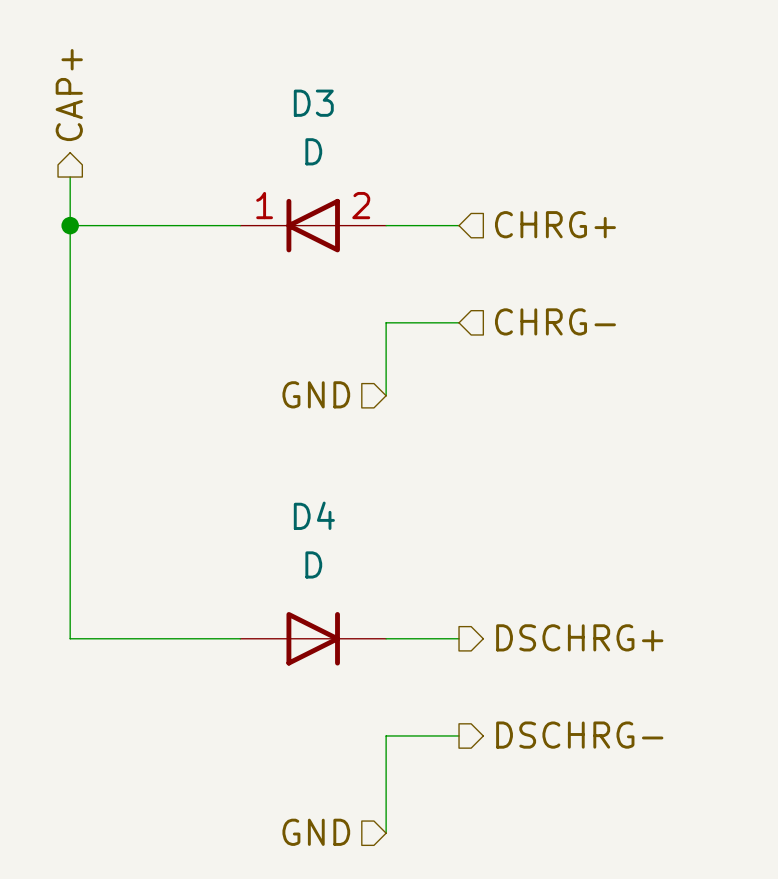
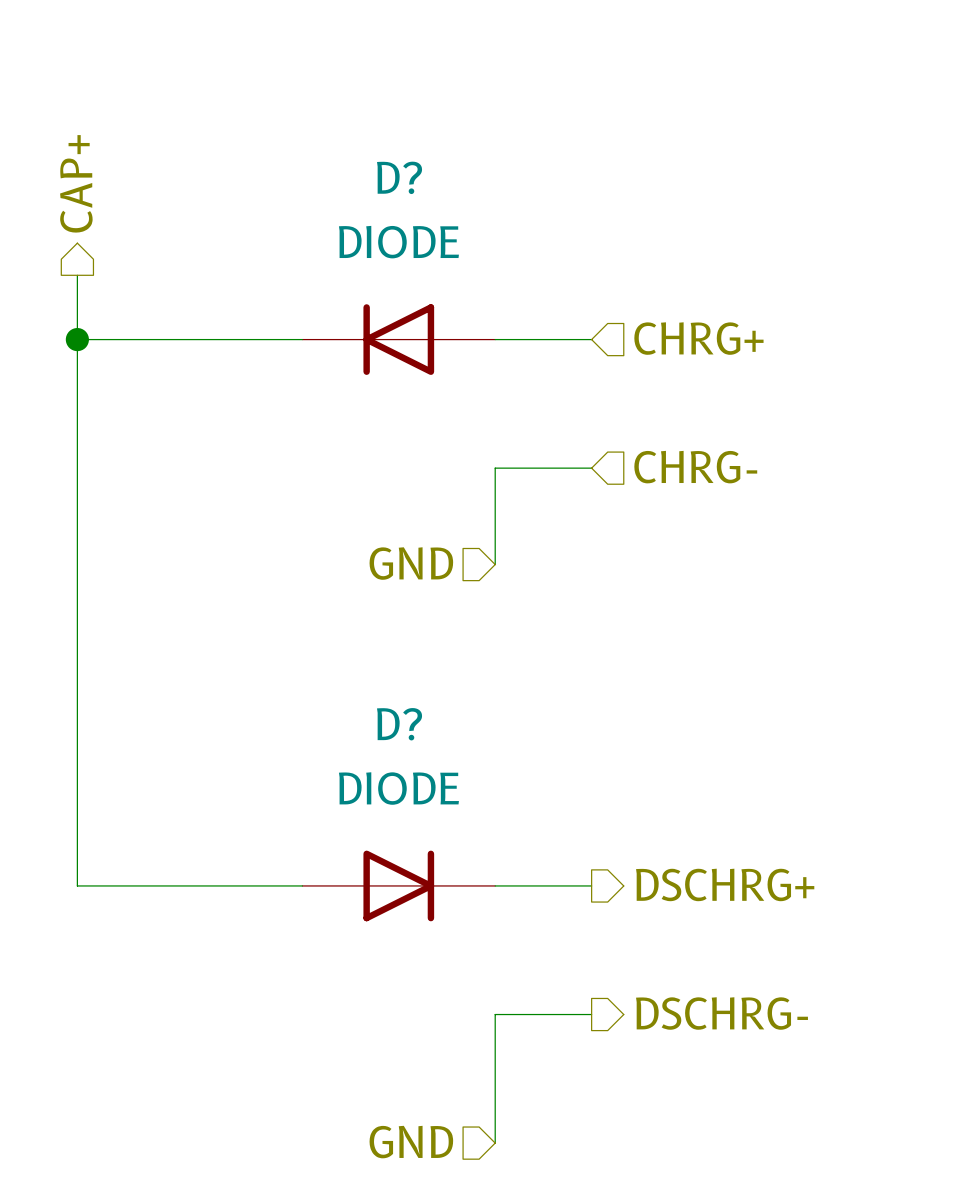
D3 name: D3 (313, 103) -> D? (399, 177)
D3 value: D (313, 151) -> DIODE (398, 242)
D3 pin number: 1 (264, 205) -> none
D3 pin number: 2 (361, 205) -> none
D4 name: D4 (314, 515) -> D? (399, 724)
D4 value: D (313, 564) -> DIODE (398, 788)

